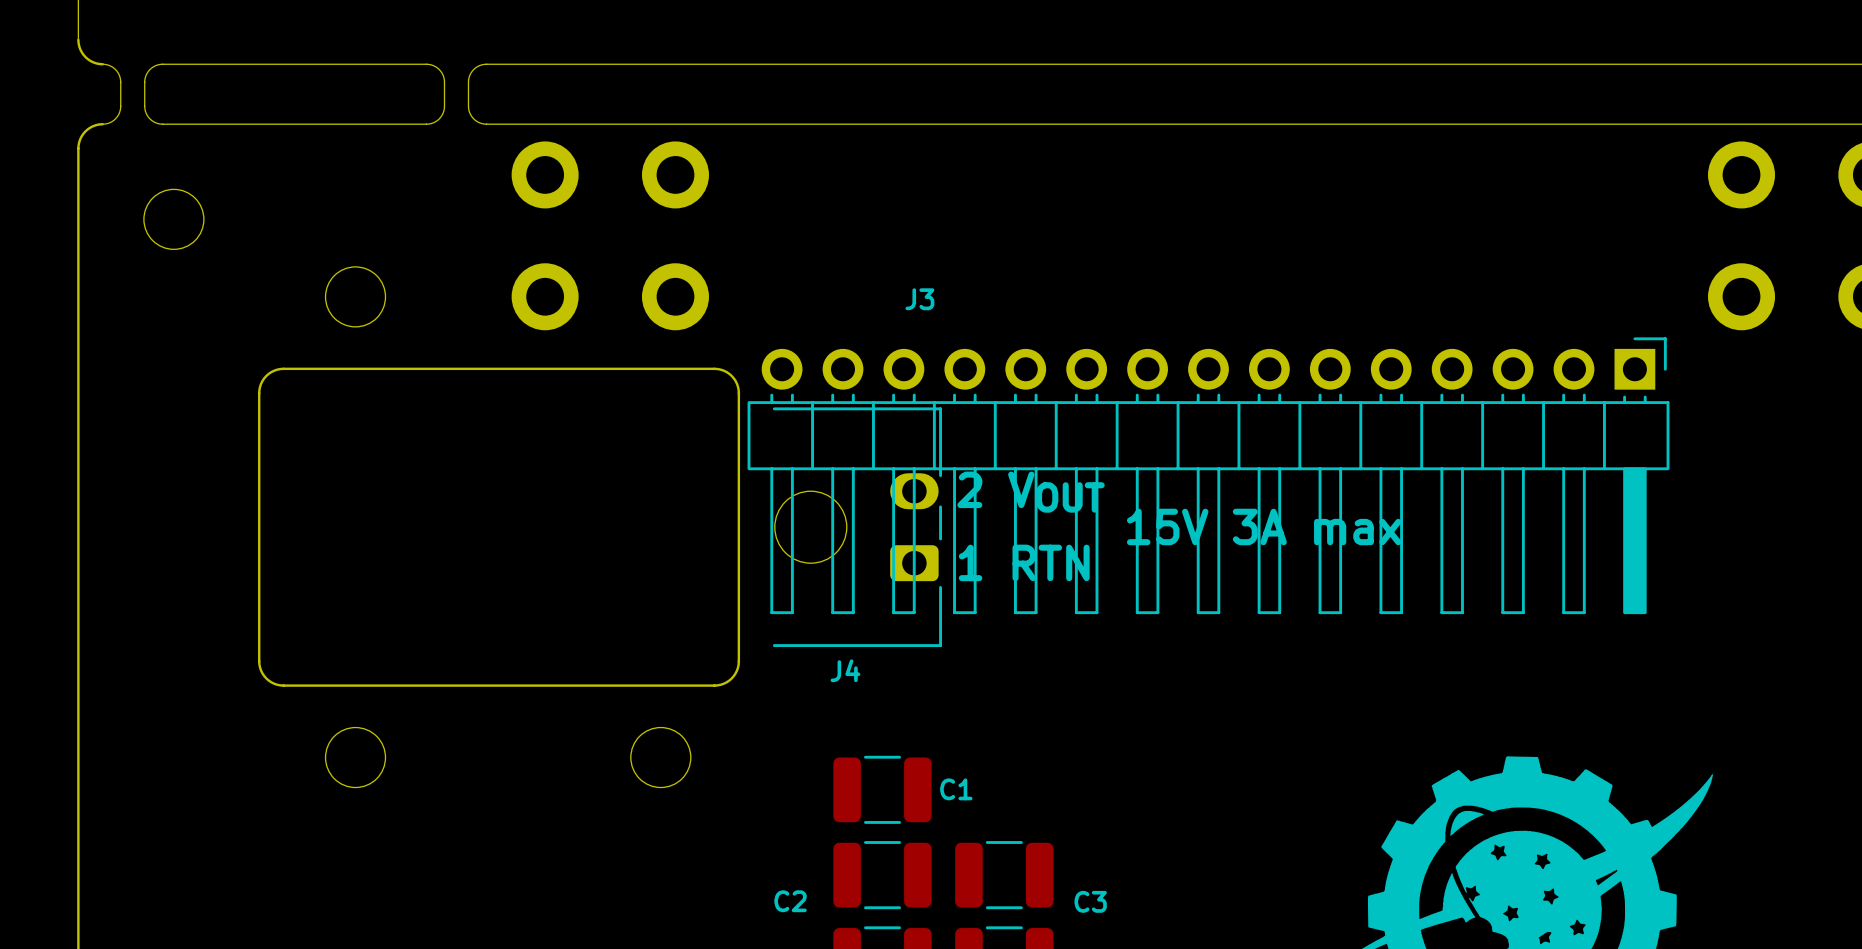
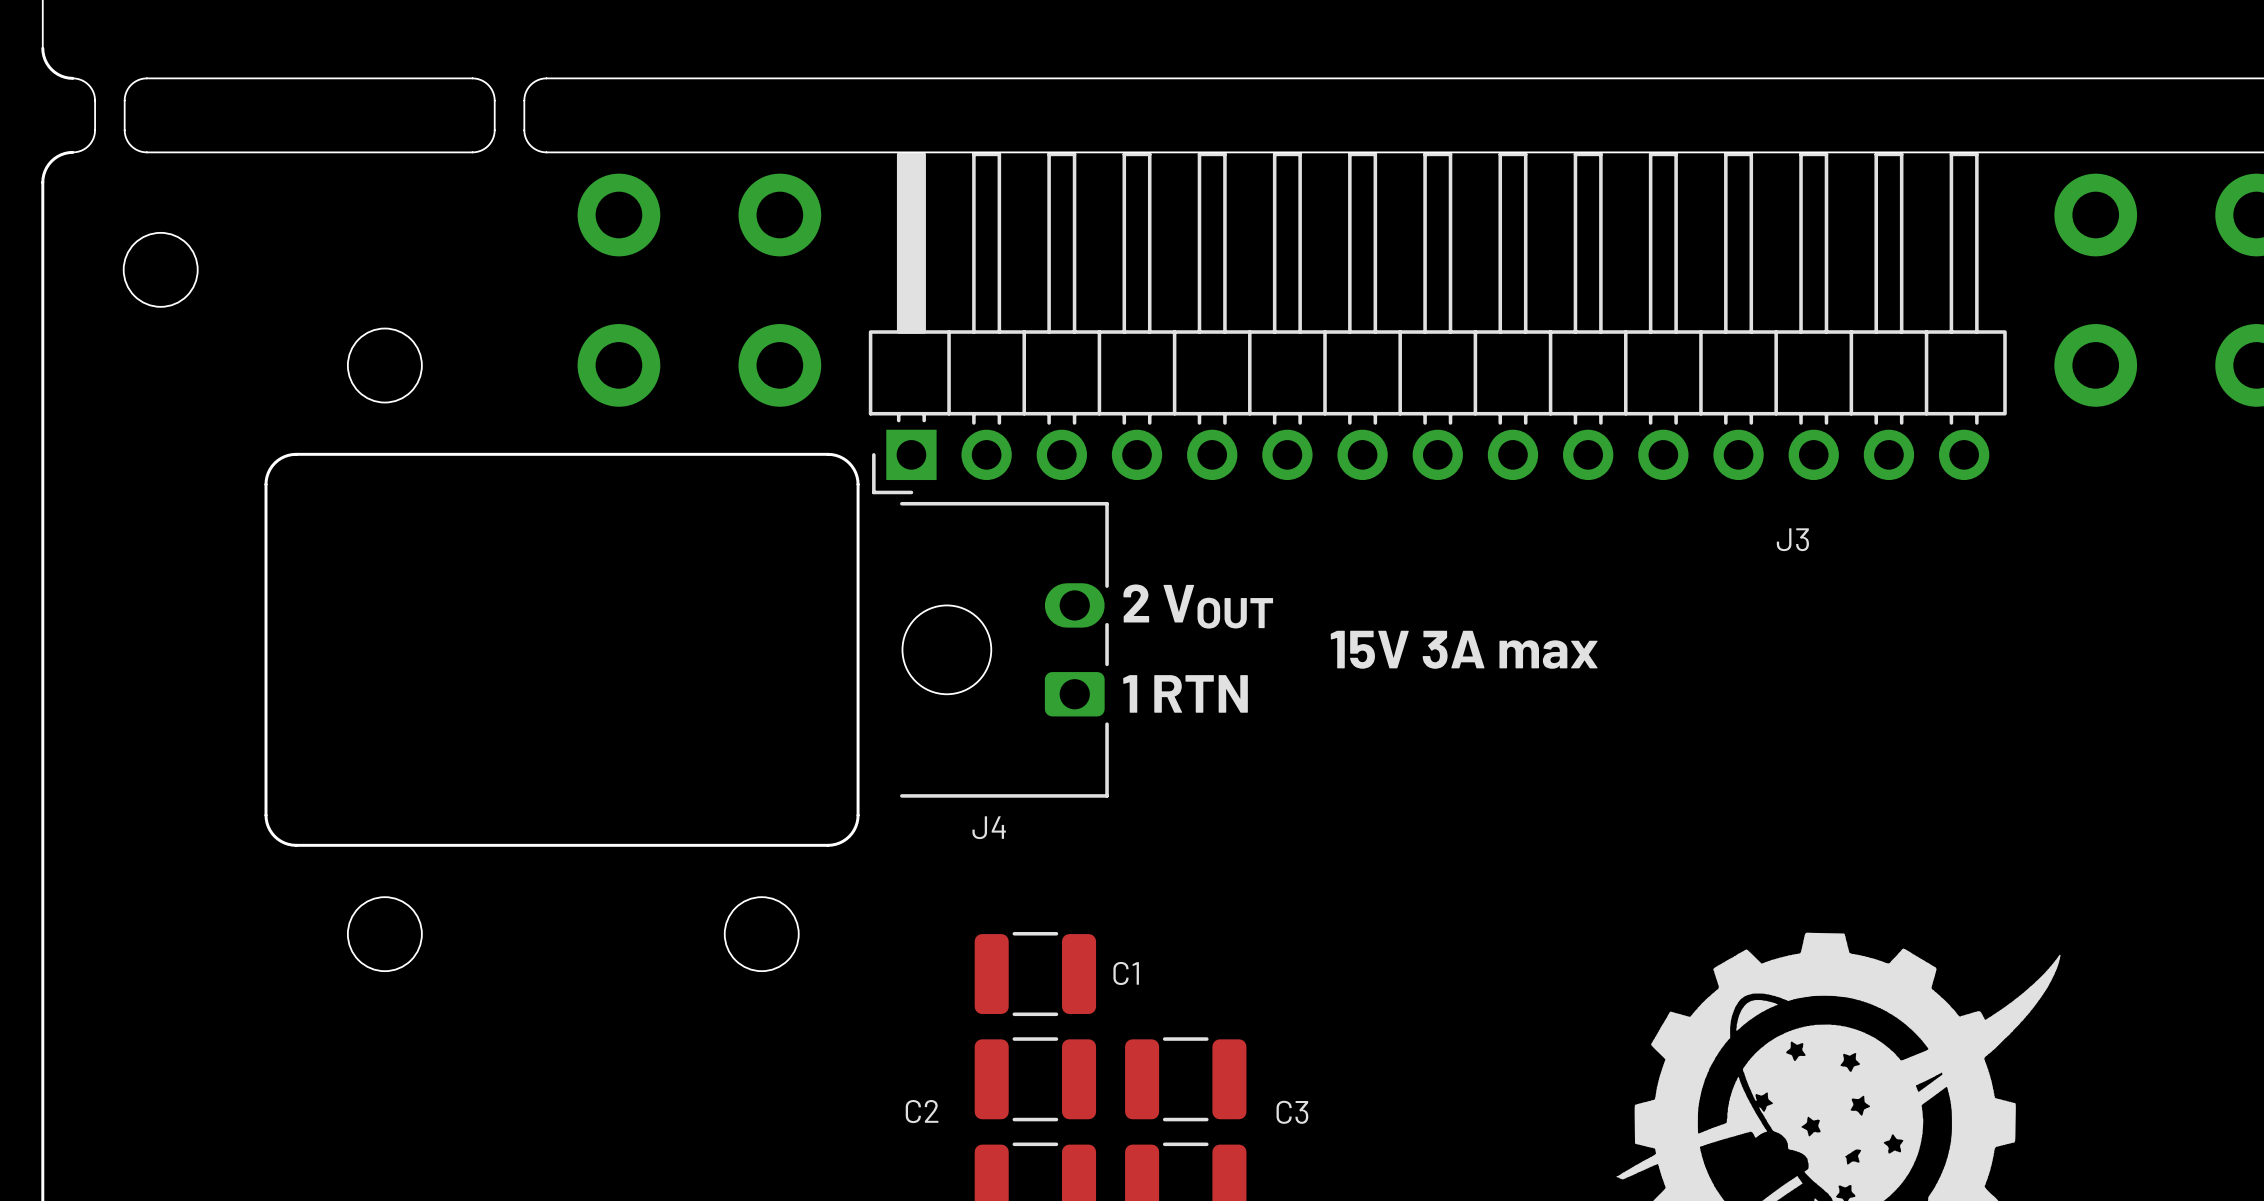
J3 rotation: 0° (1208, 475) -> 180° (1437, 323)

